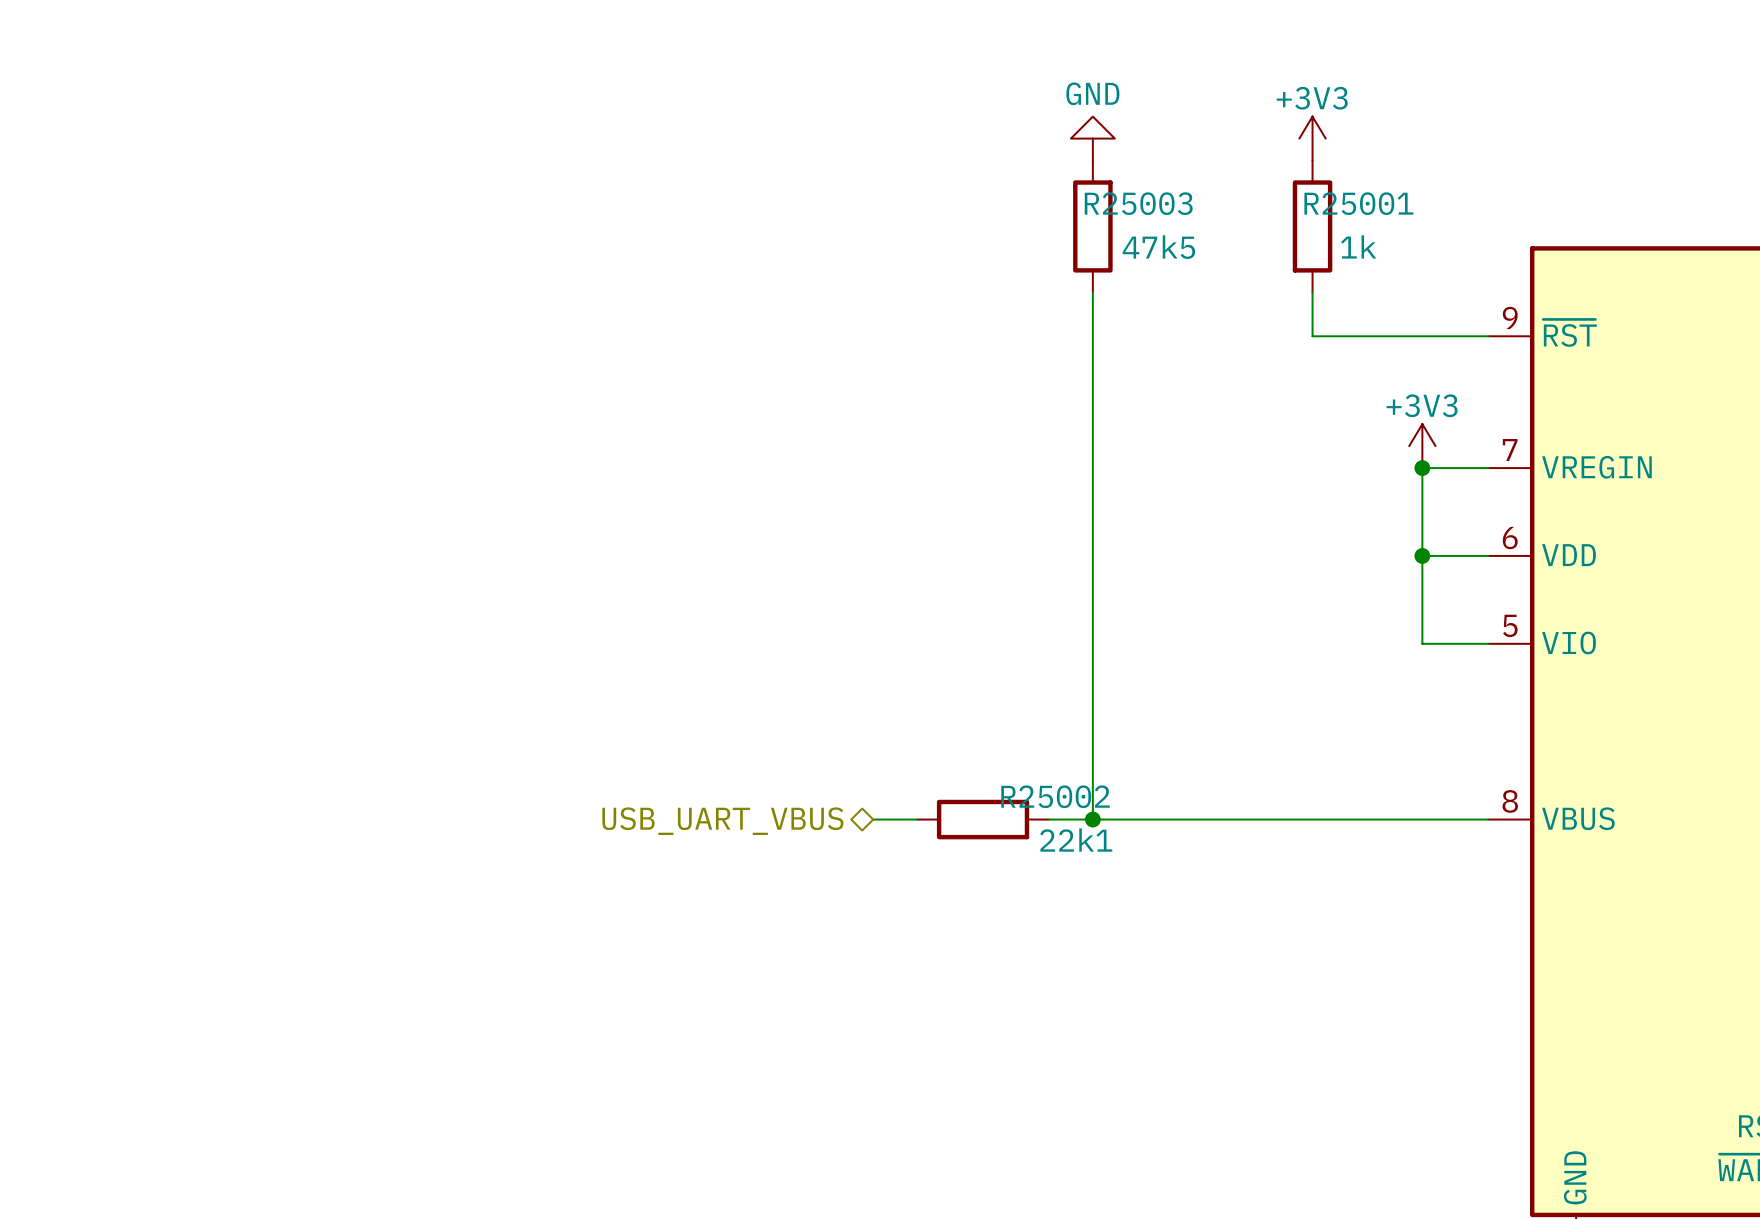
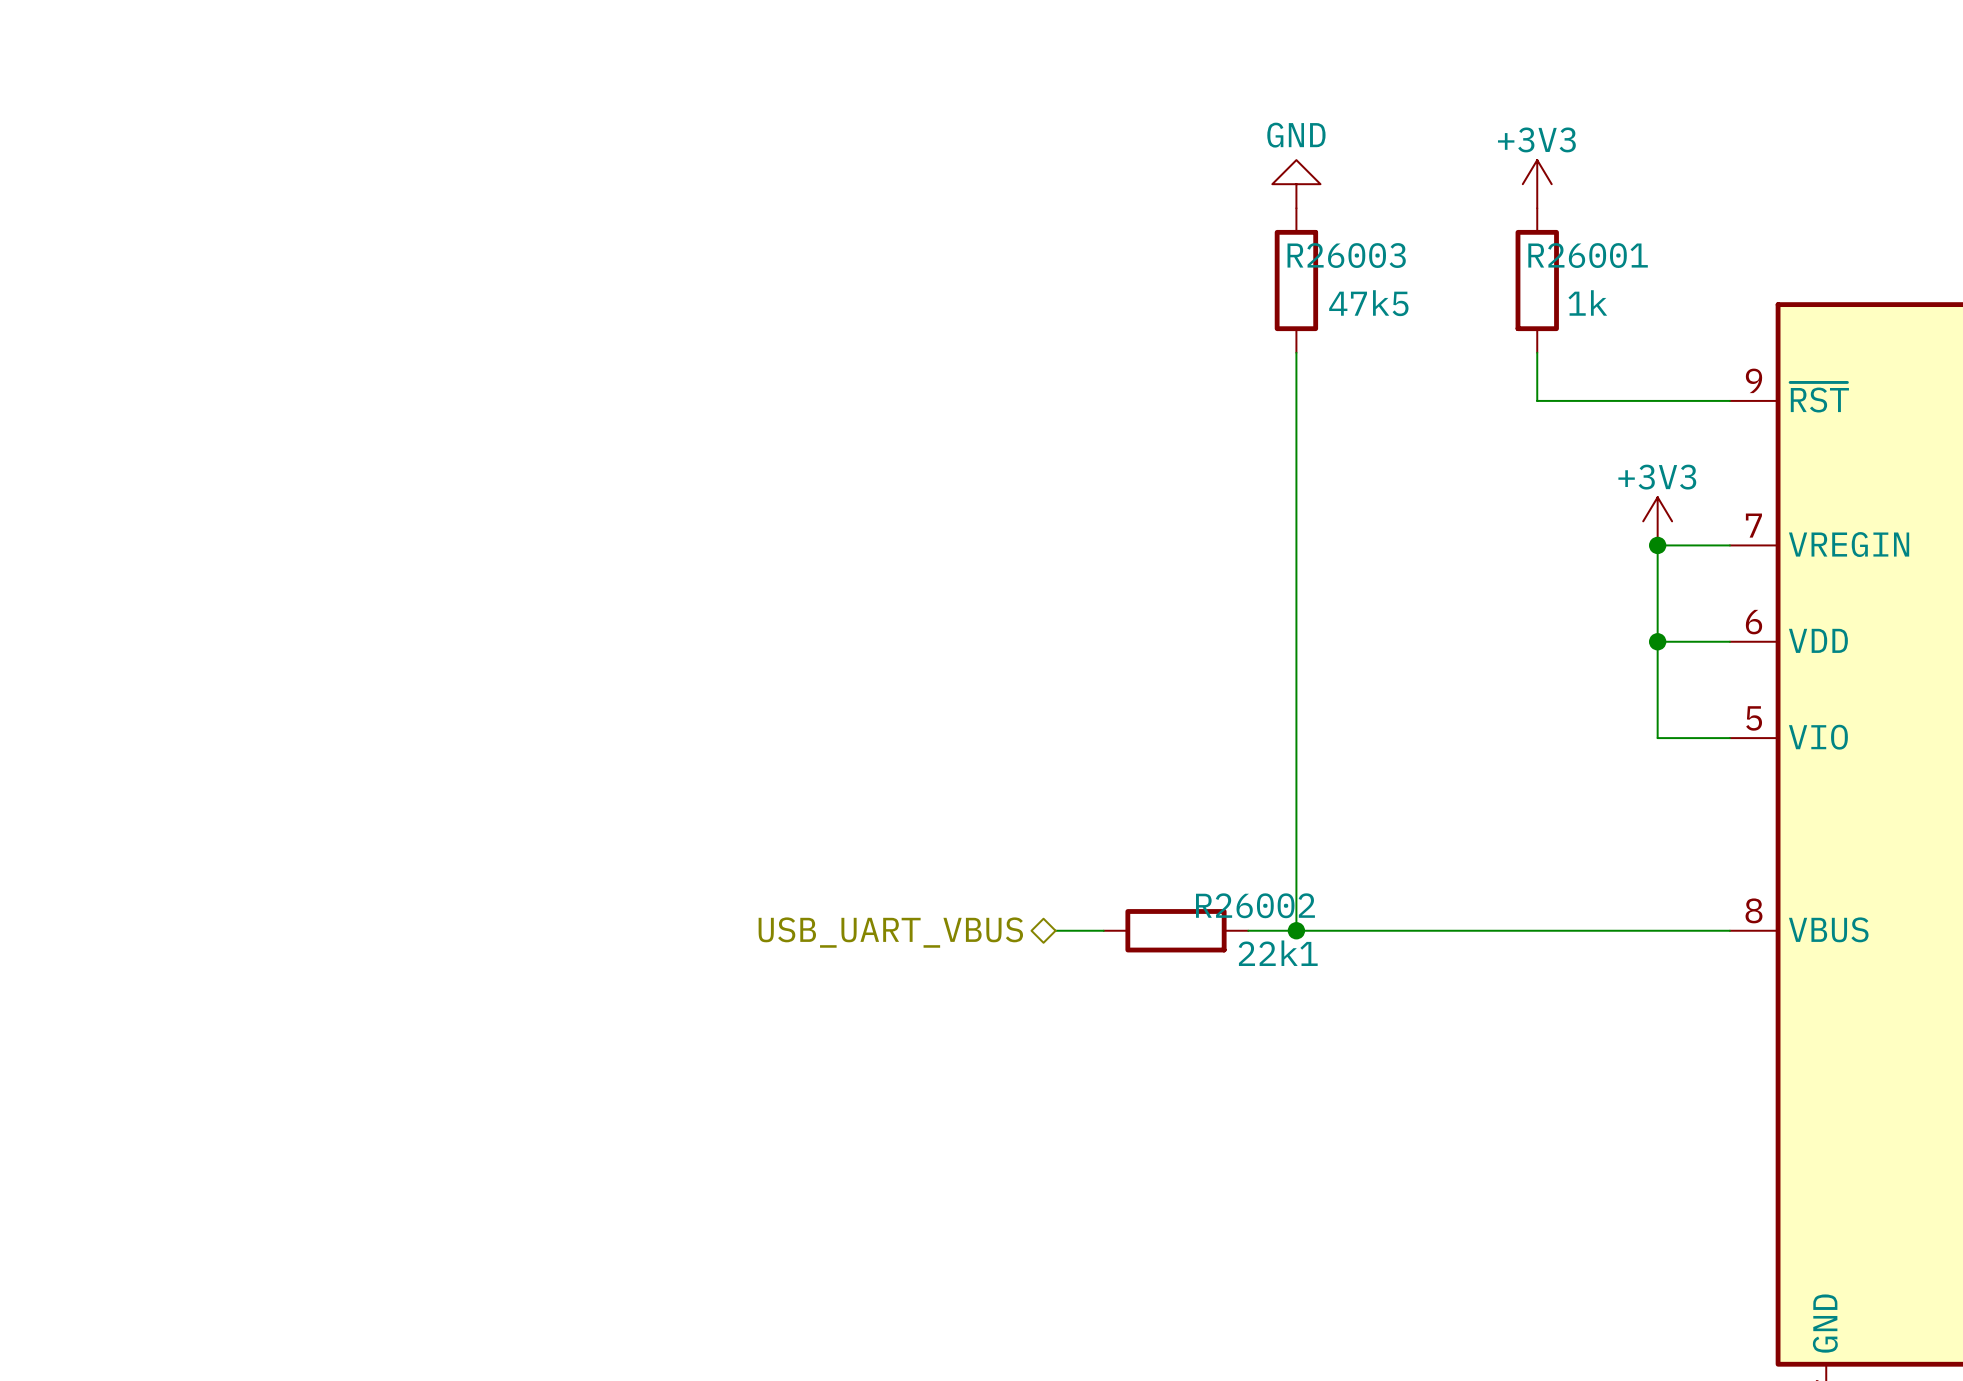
R25003 name: R25003 (1138, 203) -> R26003 (1346, 255)
R25001 name: R25001 (1358, 203) -> R26001 (1588, 255)
R25002 name: R25002 (1055, 796) -> R26002 (1255, 905)

